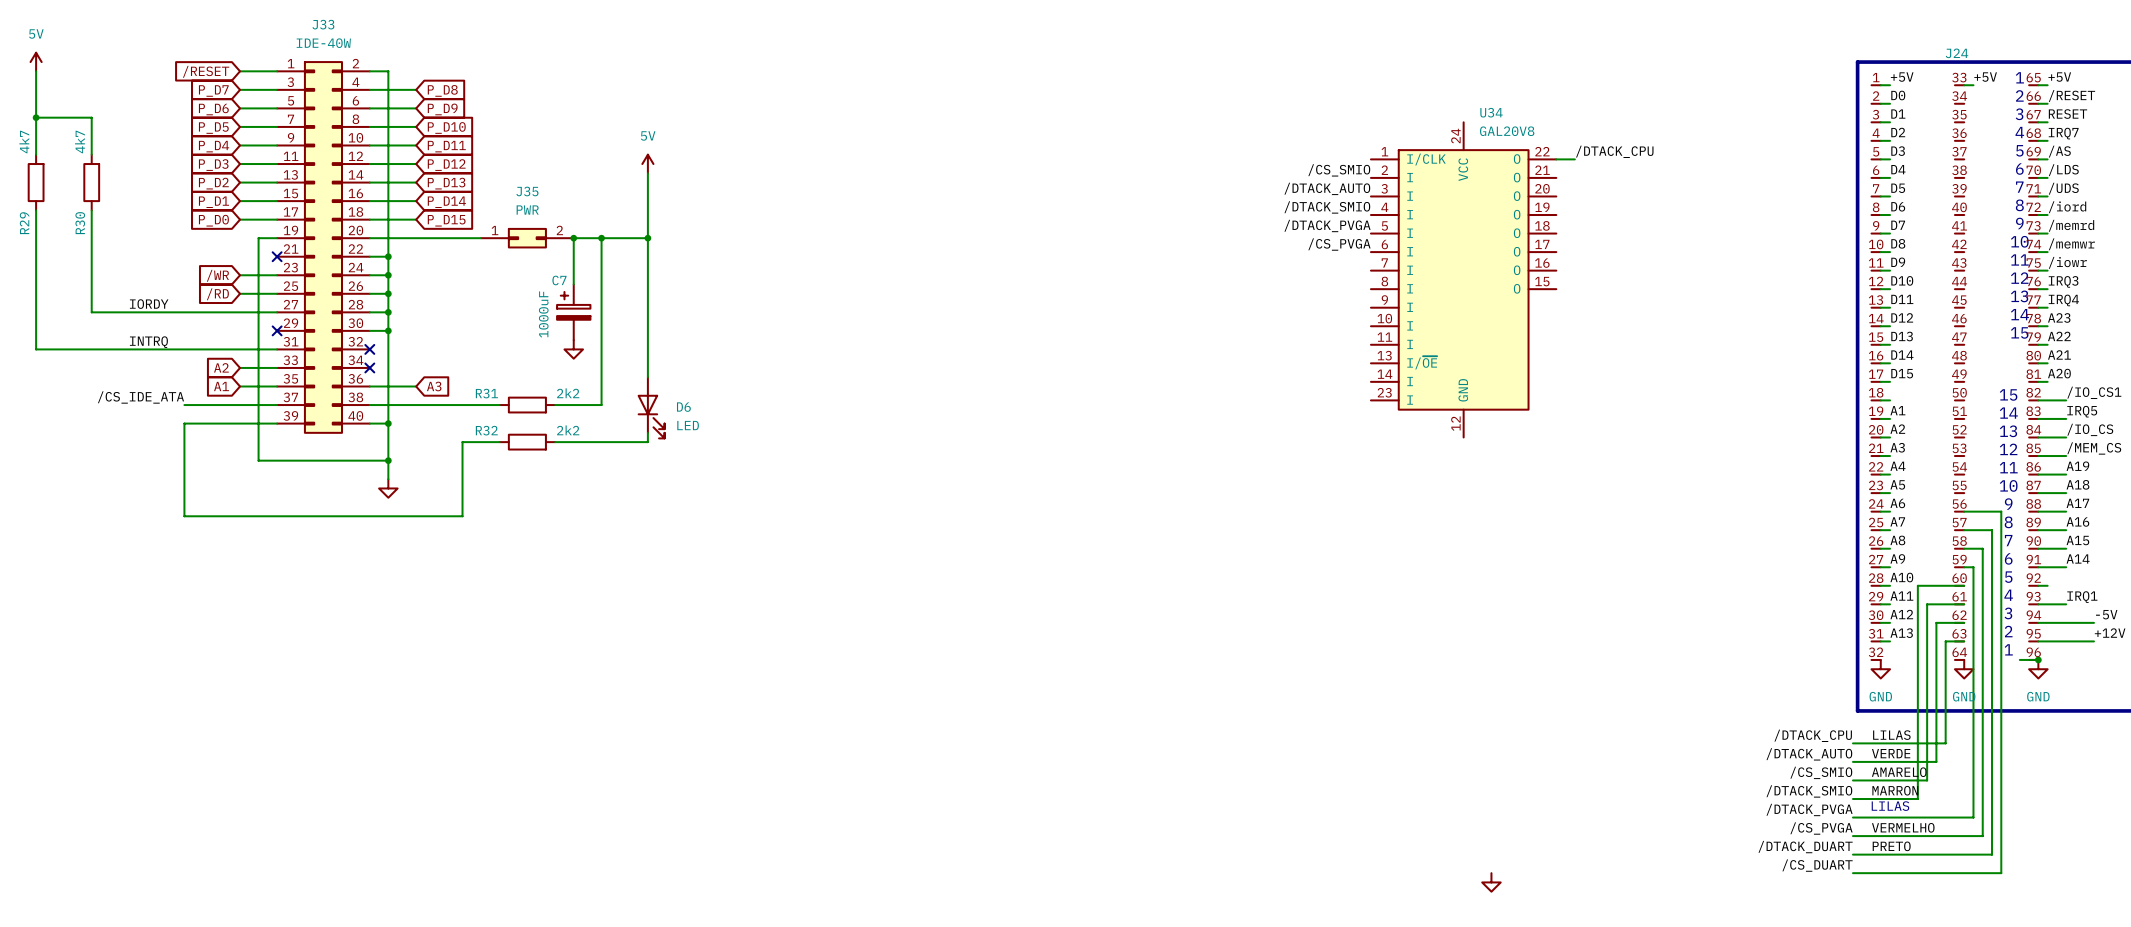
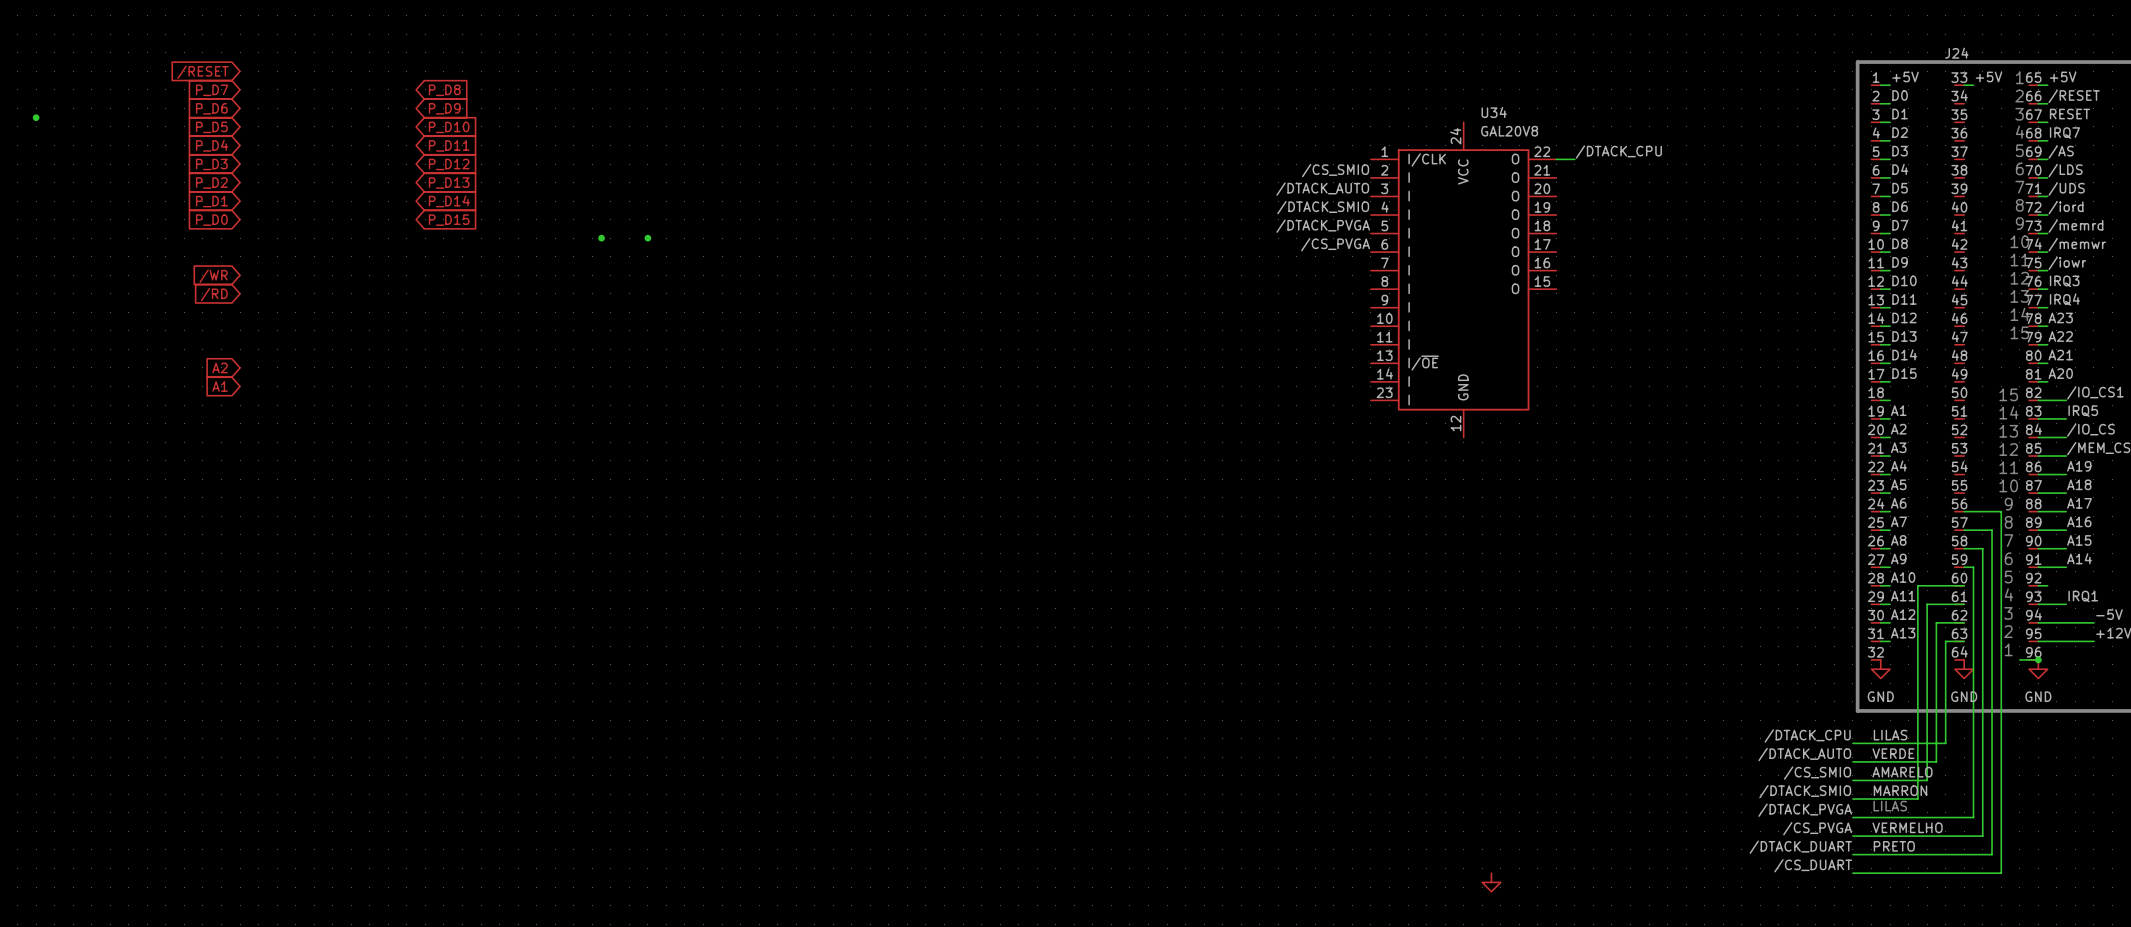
power symbol: 5V (36, 62) -> none
wire: (36, 71) (36, 154) -> none
wire: (240, 71) (277, 71) -> none
wire: (369, 71) (388, 71) (388, 479) -> none
wire: (240, 89) (277, 89) -> none
wire: (369, 89) (416, 89) -> none
wire: (240, 108) (277, 108) -> none
wire: (369, 108) (416, 108) -> none
wire: (36, 117) (91, 117) (91, 154) -> none
wire: (240, 126) (277, 126) -> none
wire: (369, 126) (416, 126) -> none
wire: (240, 145) (277, 145) -> none
wire: (369, 145) (416, 145) -> none
wire: (240, 164) (277, 164) -> none
wire: (369, 164) (416, 164) -> none
power symbol: 5V (647, 164) -> none
wire: (647, 173) (647, 377) -> none
R29: 4k7 (36, 182) -> none
R30: 4k7 (91, 182) -> none
wire: (240, 182) (277, 182) -> none
wire: (369, 182) (416, 182) -> none
wire: (240, 201) (277, 201) -> none
wire: (369, 201) (416, 201) -> none
wire: (36, 210) (36, 349) (277, 349) -> none
wire: (91, 210) (91, 312) (277, 312) -> none
wire: (240, 219) (277, 219) -> none
wire: (369, 219) (416, 219) -> none
wire: (277, 238) (258, 238) (258, 460) (388, 460) -> none
wire: (369, 238) (481, 238) -> none
J35: PWR (527, 238) -> none
junction: (573, 238) -> none
wire: (601, 238) (601, 405) (555, 405) -> none
wire: (647, 238) (573, 238) (573, 284) -> none
J33: IDE-40W (323, 247) -> none
no-connect mark: (277, 256) -> none
wire: (369, 256) (388, 256) -> none
junction: (388, 256) -> none
wire: (240, 275) (277, 275) -> none
wire: (369, 275) (388, 275) -> none
junction: (388, 275) -> none
wire: (240, 293) (277, 293) -> none
wire: (369, 293) (388, 293) -> none
junction: (388, 293) -> none
label: IORDY (149, 304) -> none
wire: (369, 312) (388, 312) -> none
junction: (388, 312) -> none
C7: 1000uF (573, 312) -> none
no-connect mark: (277, 330) -> none
wire: (369, 330) (388, 330) -> none
junction: (388, 330) -> none
label: INTRQ (148, 342) -> none
no-connect mark: (369, 349) -> none
power symbol: (573, 349) -> none
wire: (240, 367) (277, 367) -> none
no-connect mark: (369, 367) -> none
wire: (240, 386) (277, 386) -> none
wire: (369, 386) (416, 386) -> none
global label: A3 (434, 386) -> none
label: /CS_IDE_ATA (140, 397) -> none
wire: (184, 405) (277, 405) -> none
wire: (369, 405) (499, 405) -> none
R31: 2k2 (527, 405) -> none
D6: LED (651, 407) -> none
wire: (277, 423) (184, 423) (184, 516) (462, 516) (462, 442) (499, 442) -> none
wire: (369, 423) (388, 423) -> none
junction: (388, 423) -> none
wire: (647, 432) (647, 442) (555, 442) -> none
R32: 2k2 (527, 442) -> none
junction: (388, 460) -> none
power symbol: (388, 488) -> none

